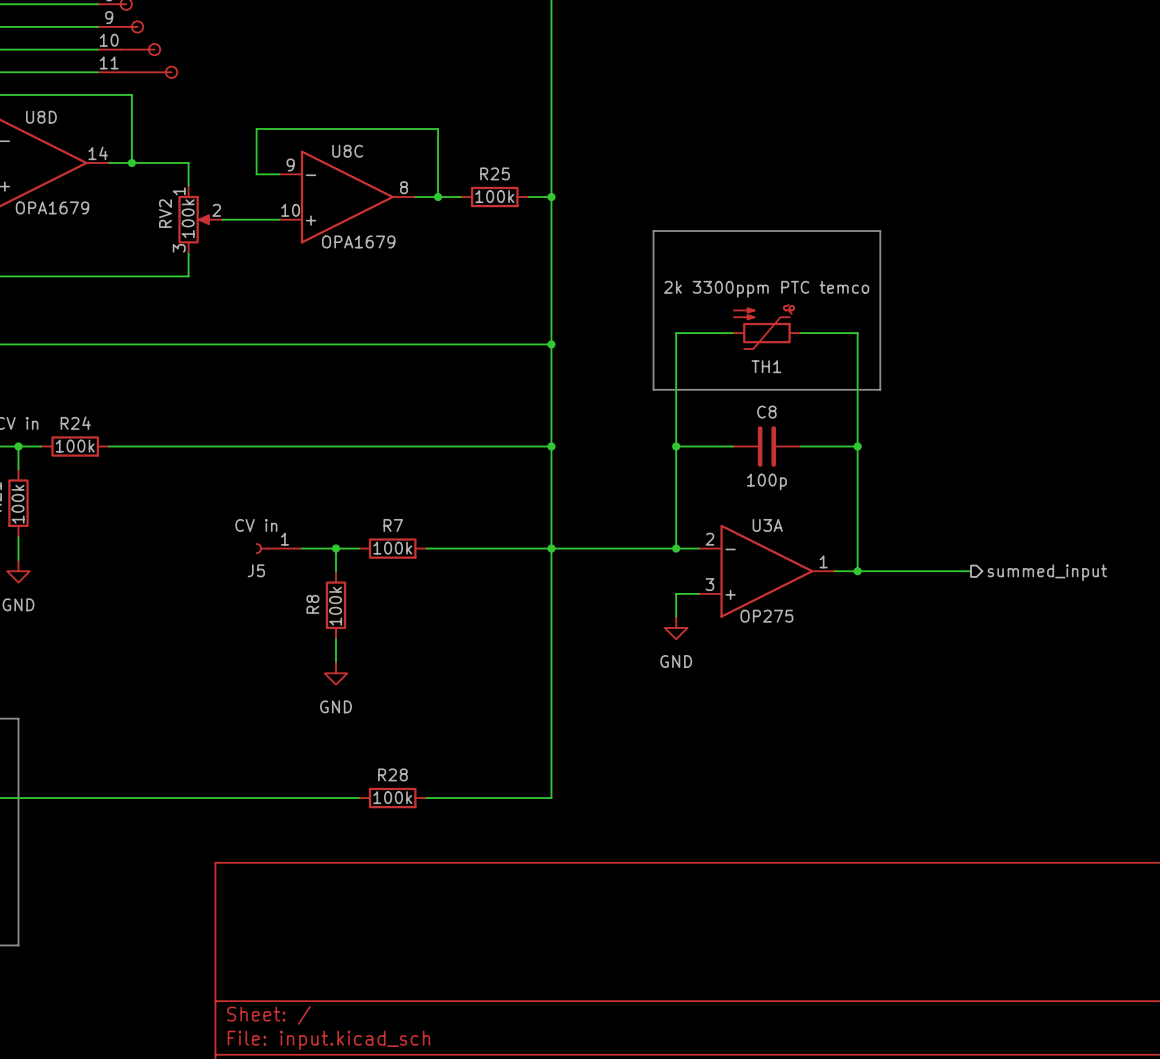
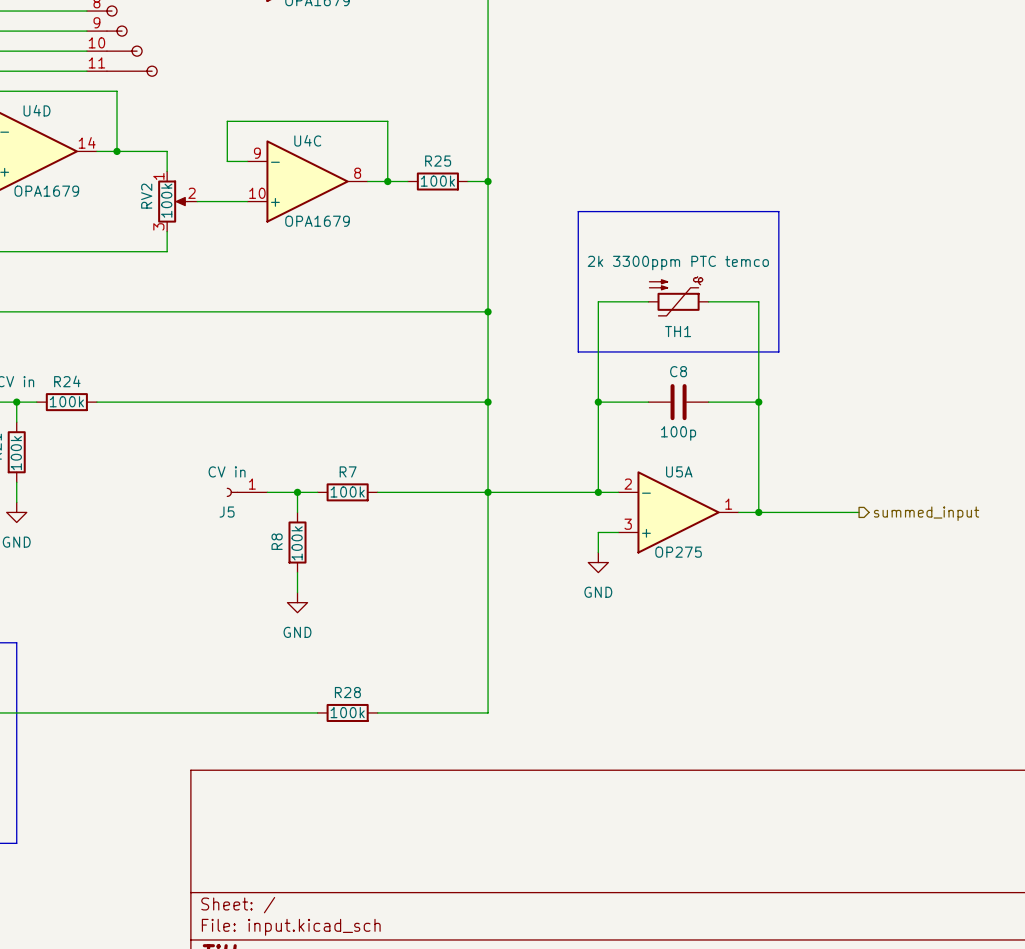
U8D name: U8D (41, 117) -> U4D (37, 110)
U8C name: U8C (347, 151) -> U4C (307, 140)
U3A name: U3A (767, 525) -> U5A (679, 471)

